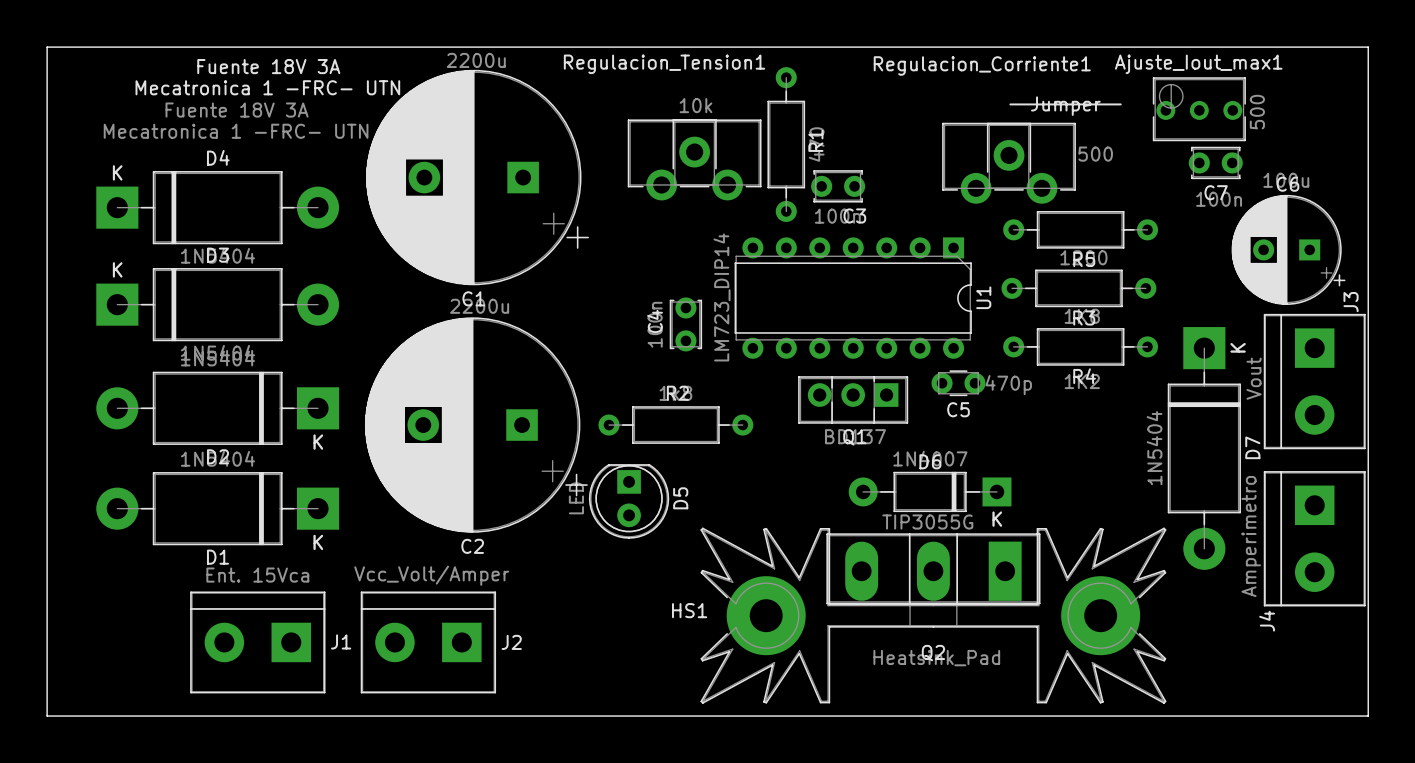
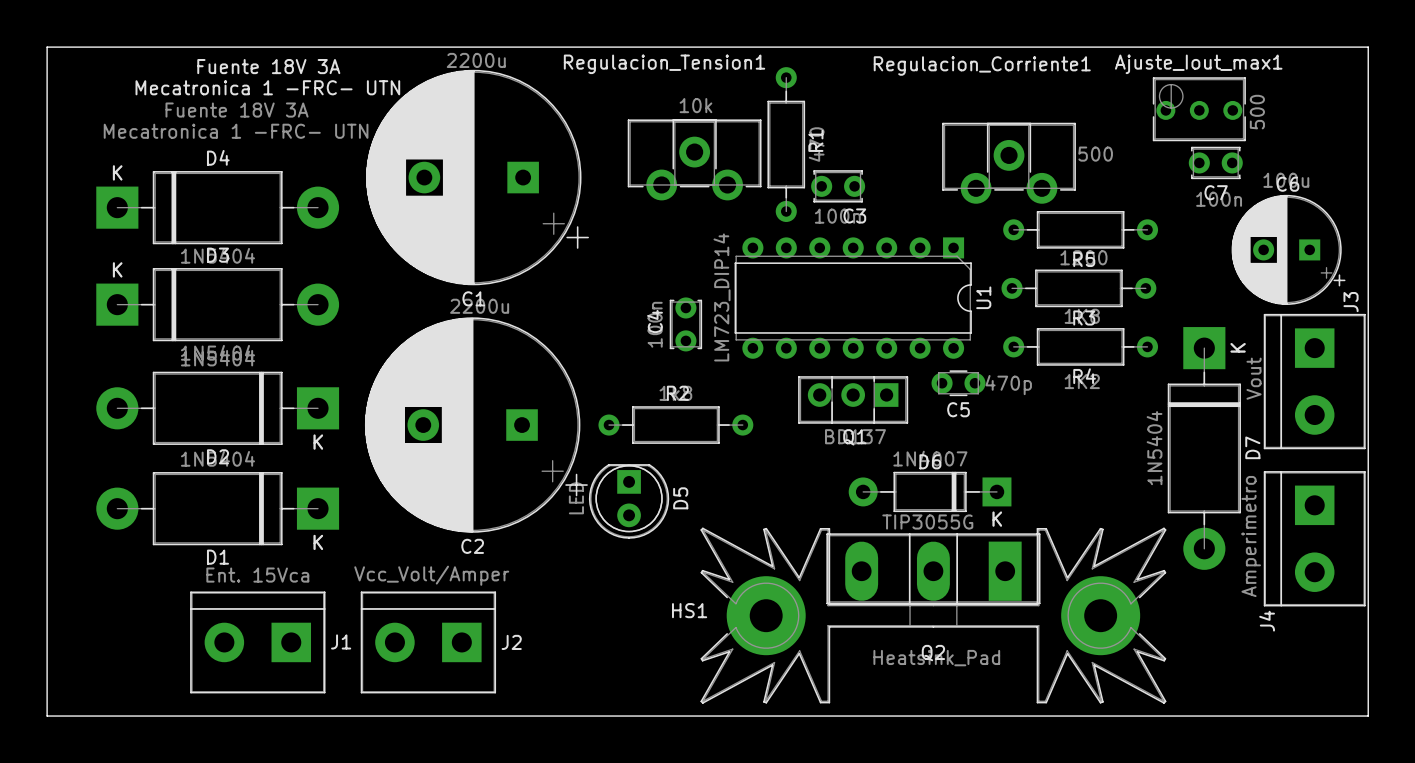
line: (1010, 104) (1120, 104) -> none
text: Jumper (1065, 106) -> none

